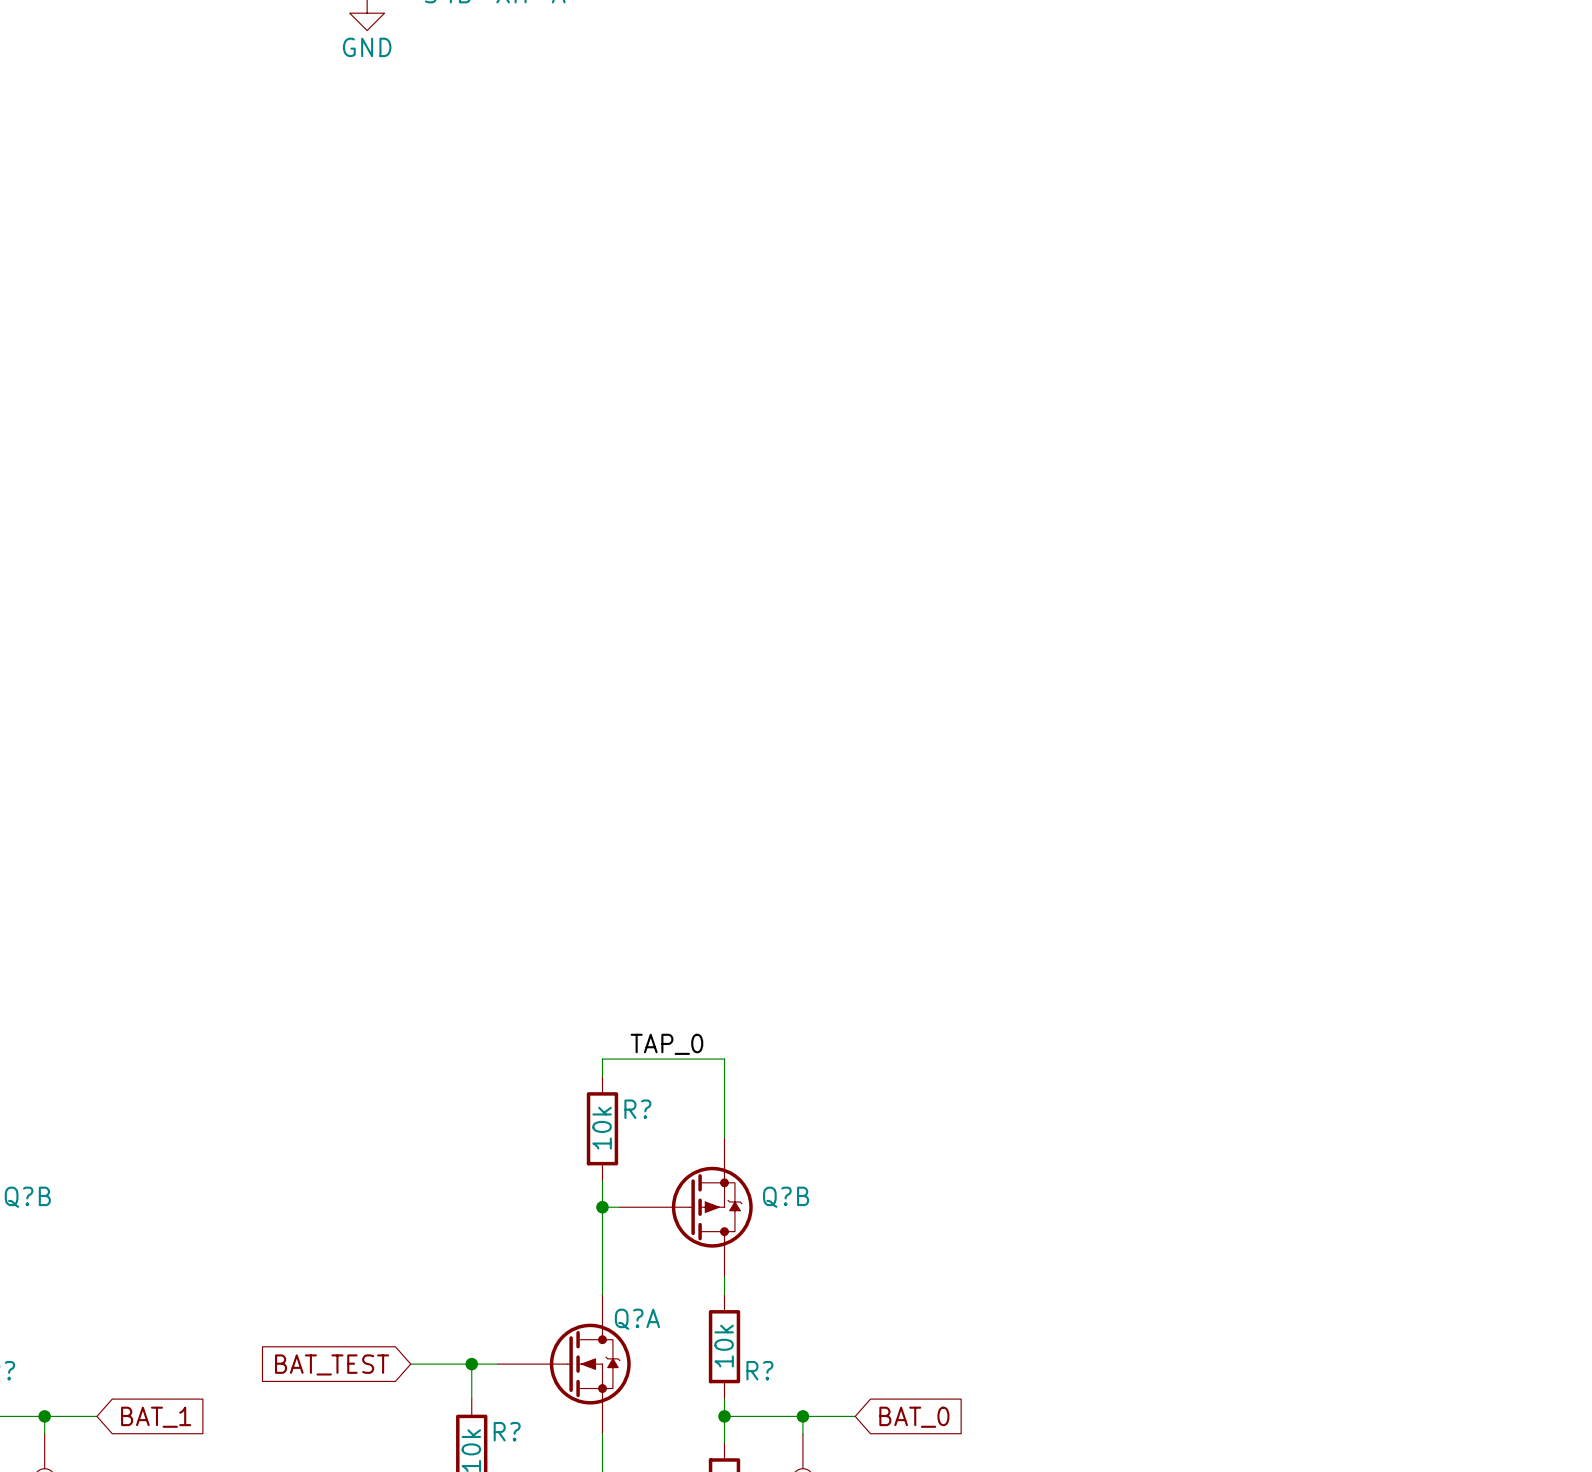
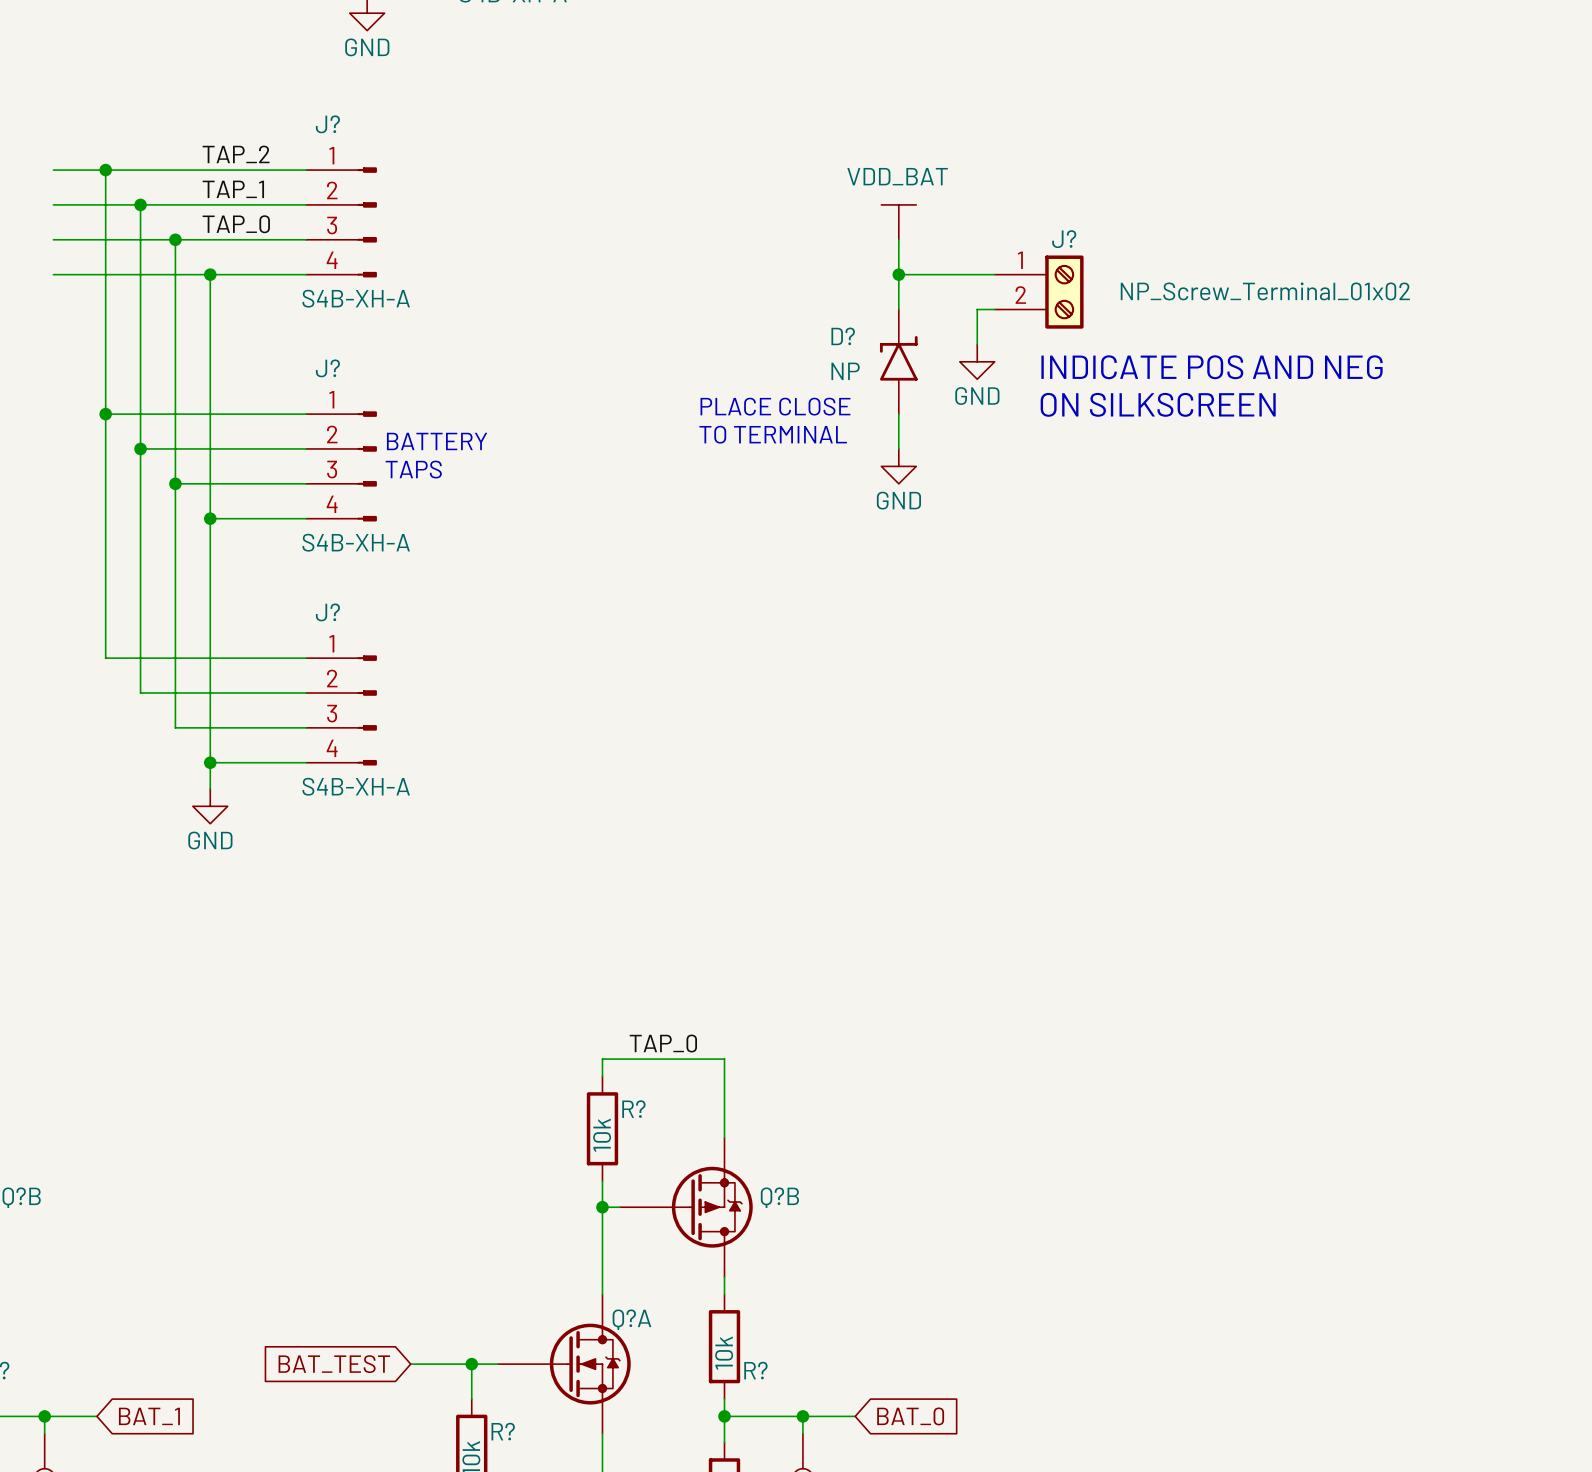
label: none -> TAP_2 (236, 154)
wire: none -> (53, 170) (306, 170)
wire: none -> (105, 170) (105, 658) (306, 658)
junction: none -> (105, 170)
label: none -> TAP_1 (233, 189)
wire: none -> (53, 204) (306, 204)
wire: none -> (140, 204) (140, 693) (306, 693)
junction: none -> (140, 204)
J?: none -> S4B-XH-A (341, 222)
power symbol: none -> VDD_BAT (898, 222)
label: none -> TAP_0 (236, 224)
wire: none -> (53, 239) (306, 239)
wire: none -> (175, 239) (175, 727) (306, 727)
junction: none -> (175, 239)
wire: none -> (898, 239) (898, 309)
wire: none -> (53, 274) (306, 274)
wire: none -> (210, 274) (210, 788)
junction: none -> (210, 274)
wire: none -> (898, 274) (994, 274)
junction: none -> (898, 274)
J?: none -> NP_Screw_Terminal_01x02 (1039, 292)
wire: none -> (994, 309) (977, 309) (977, 344)
D?: none -> (898, 361)
power symbol: none -> GND (977, 361)
text: none -> INDICATE POS AND NEG (1212, 367)
text: none -> ON SILKSCREEN (1158, 404)
text: none -> PLACE CLOSE (775, 406)
wire: none -> (105, 414) (306, 414)
junction: none -> (105, 414)
wire: none -> (898, 414) (898, 448)
text: none -> TO TERMINAL (773, 434)
text: none -> BATTERY (437, 441)
wire: none -> (140, 448) (306, 448)
junction: none -> (140, 448)
J?: none -> S4B-XH-A (341, 466)
power symbol: none -> GND (898, 466)
text: none -> TAPS (413, 469)
wire: none -> (175, 483) (306, 483)
junction: none -> (175, 483)
wire: none -> (210, 518) (306, 518)
junction: none -> (210, 518)
J?: none -> S4B-XH-A (341, 710)
wire: none -> (210, 762) (306, 762)
junction: none -> (210, 762)
power symbol: none -> GND (210, 806)

